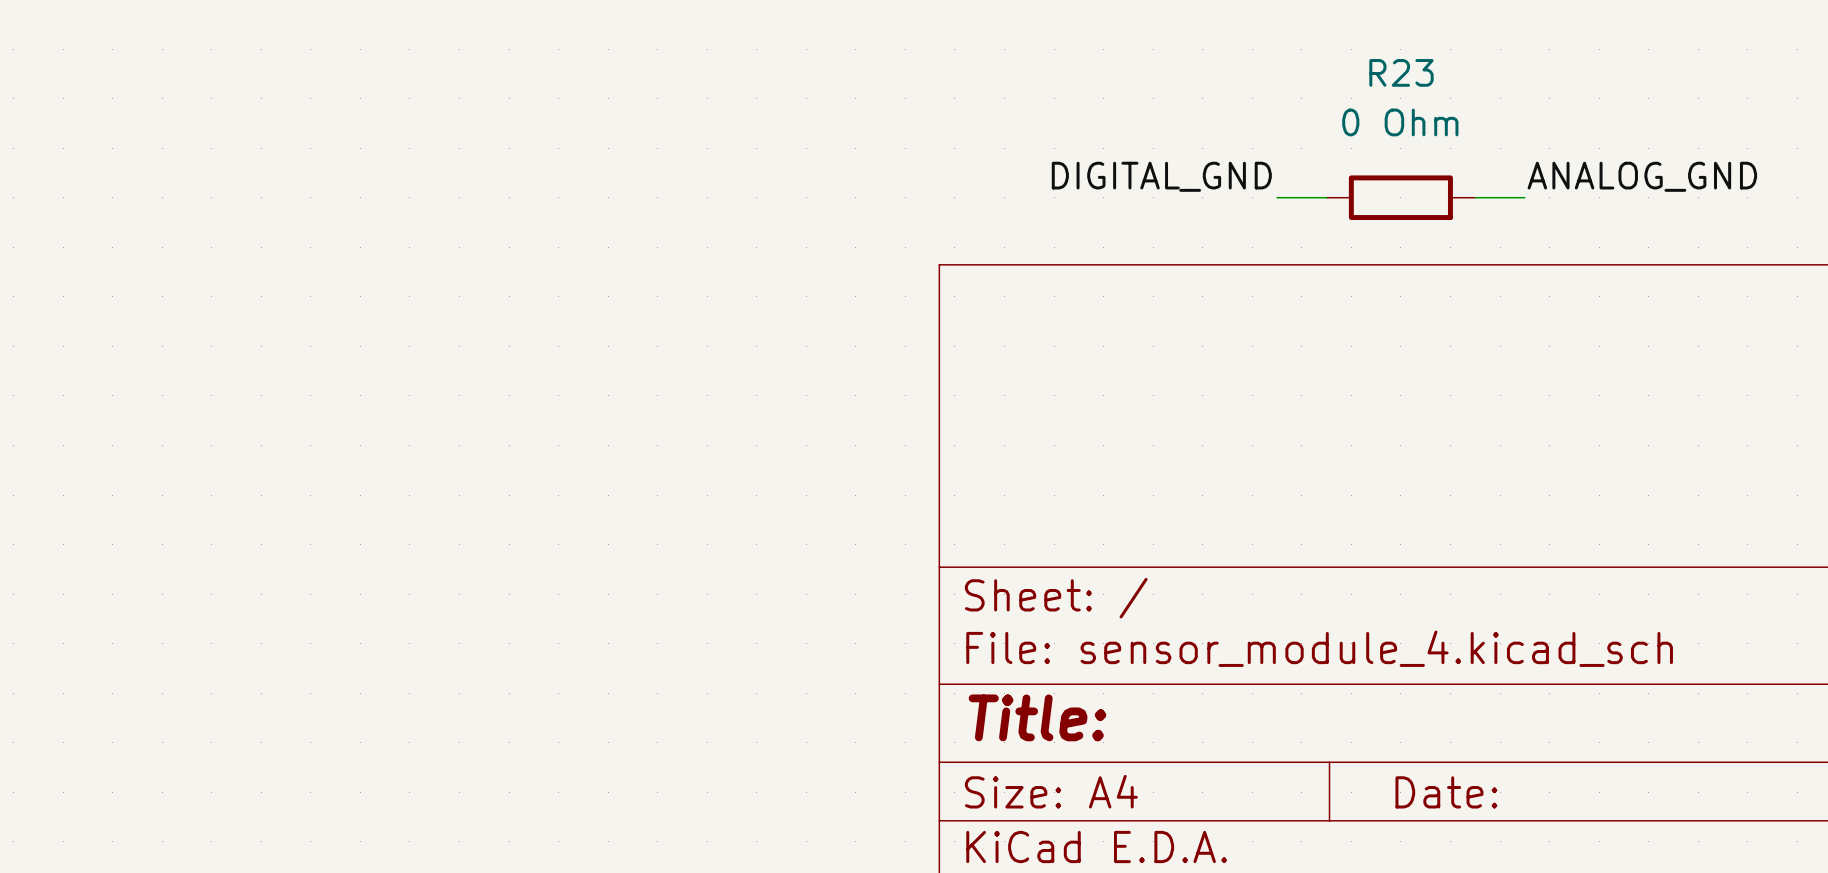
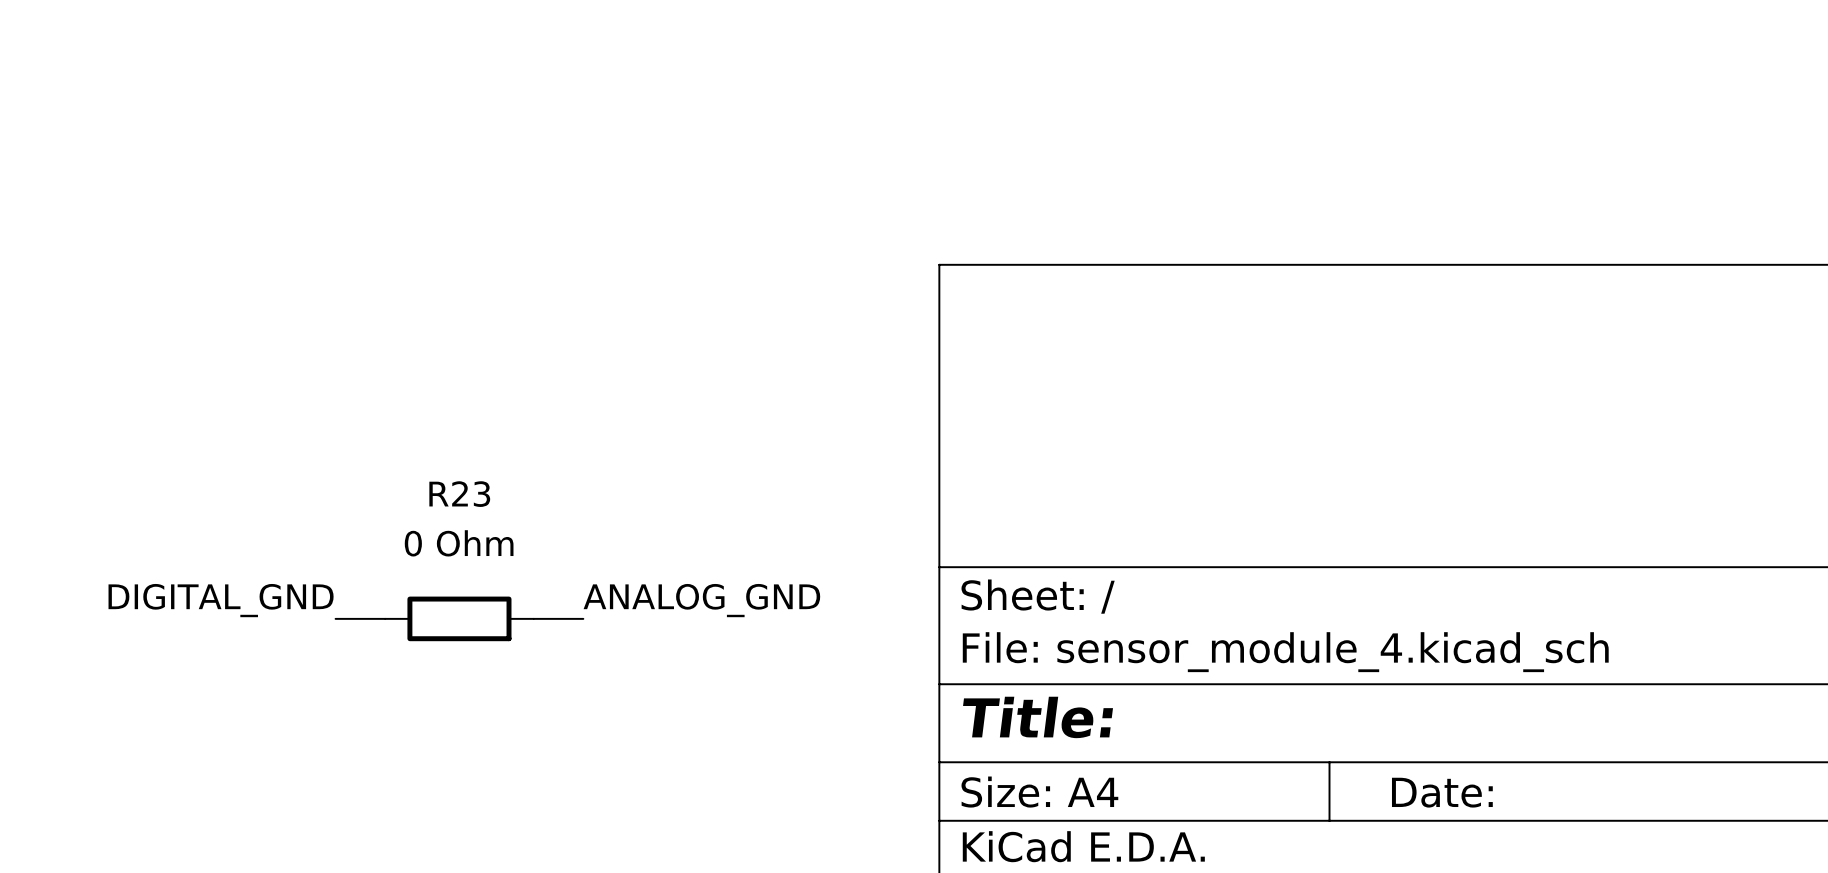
label: DIGITAL_GND (1161, 176) -> none
label: ANALOG_GND (1642, 176) -> none
wire: (1277, 197) (1326, 197) -> none
R23 position: (1400, 197) -> (459, 618)
wire: (1475, 197) (1524, 197) -> none
label: none -> DIGITAL_GND (221, 600)
label: none -> ANALOG_GND (701, 600)
wire: none -> (335, 618) (385, 618)
wire: none -> (533, 618) (583, 618)

